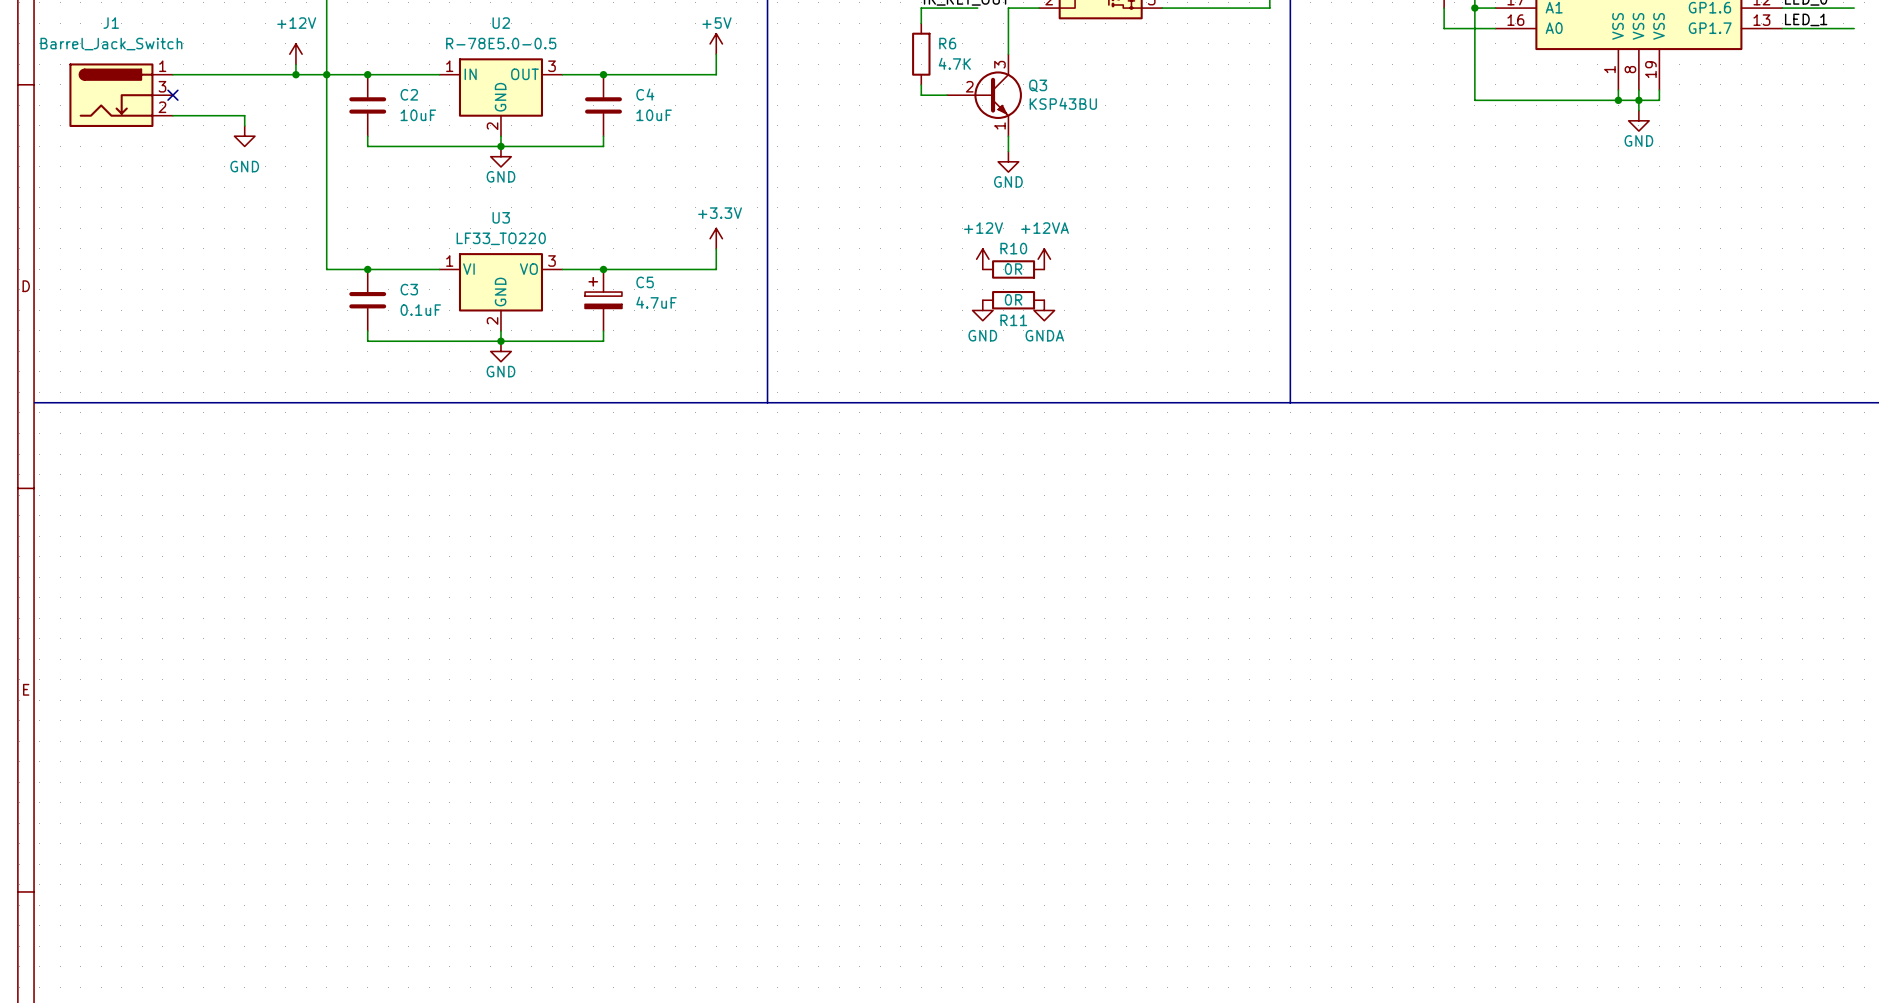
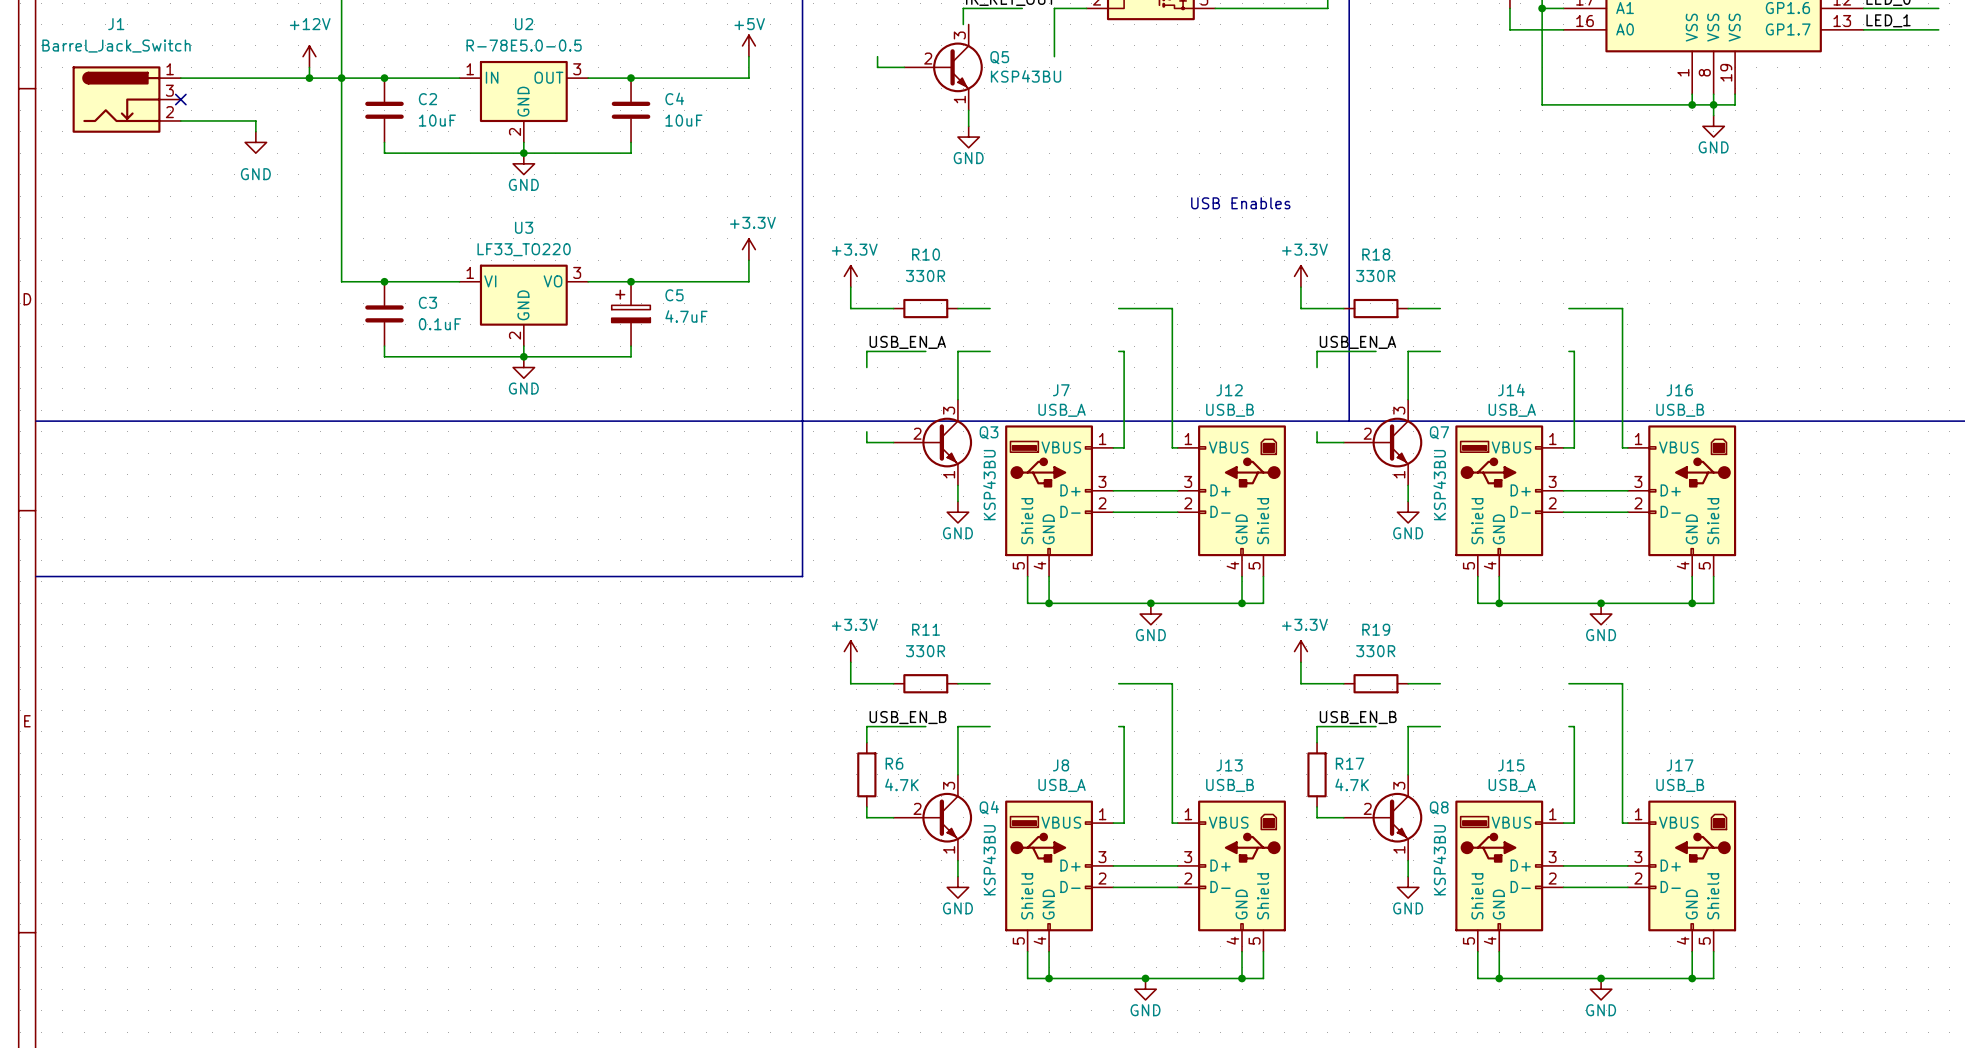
R6 position: (921, 54) -> (866, 774)
Q5: none -> KSP43BU (943, 67)
wire: (921, 84) (921, 95) (946, 95) -> (877, 56) (877, 67) (904, 67)
Q3 position: (984, 95) -> (932, 442)
Q3 value rotation: 0° (1063, 103) -> 90° counterclockwise (989, 485)
wire: (1008, 136) (1008, 151) -> (968, 110) (968, 126)
power symbol position: GND (1008, 161) -> GND (968, 137)
text: none -> USB Enables (1240, 203)
R10 name position: R10 (1013, 248) -> R10 (926, 254)
power symbol: +12V (982, 259) -> none
power symbol: +12VA (1044, 259) -> none
power symbol: none -> +3.3V (850, 276)
power symbol: none -> +3.3V (1300, 276)
R10 position: (1013, 269) -> (925, 308)
R10 value: 0R (1013, 269) -> 330R (925, 276)
wire: none -> (850, 287) (850, 308) (893, 308)
wire: none -> (1300, 287) (1300, 308) (1343, 308)
wire: none -> (957, 308) (990, 308)
wire: none -> (1118, 308) (1172, 308) (1172, 447) (1177, 447)
R18: none -> 330R (1375, 308)
wire: none -> (1408, 308) (1440, 308)
wire: none -> (1568, 308) (1622, 308) (1622, 447) (1627, 447)
R11 value: 0R (1013, 299) -> 330R (925, 651)
R11 position: (1013, 300) -> (925, 683)
power symbol: GND (982, 310) -> none
power symbol: GNDA (1044, 310) -> none
R11 name position: R11 (1013, 320) -> R11 (926, 629)
label: none -> USB_EN_A (907, 342)
label: none -> USB_EN_A (1357, 342)
wire: none -> (925, 351) (866, 351) (866, 367)
wire: none -> (990, 351) (957, 351) (957, 399)
wire: none -> (1118, 351) (1124, 351) (1124, 447) (1113, 447)
wire: none -> (1375, 351) (1317, 351) (1317, 367)
wire: none -> (1440, 351) (1408, 351) (1408, 399)
wire: none -> (1568, 351) (1574, 351) (1574, 447) (1563, 447)
line: none -> (802, 421) (802, 576) (36, 576)
wire: none -> (866, 431) (866, 442) (893, 442)
wire: none -> (1317, 431) (1317, 442) (1343, 442)
Q7: none -> KSP43BU (1383, 442)
wire: none -> (957, 485) (957, 501)
wire: none -> (1408, 485) (1408, 501)
wire: none -> (1113, 490) (1177, 490)
wire: none -> (1563, 490) (1627, 490)
J7: none -> USB_A (1059, 500)
J12: none -> USB_B (1231, 500)
J14: none -> USB_A (1509, 500)
J16: none -> USB_B (1682, 500)
power symbol: none -> GND (957, 512)
wire: none -> (1113, 512) (1177, 512)
power symbol: none -> GND (1408, 512)
wire: none -> (1563, 512) (1627, 512)
wire: none -> (1027, 576) (1027, 603) (1263, 603) (1263, 576)
wire: none -> (1049, 576) (1049, 603)
wire: none -> (1242, 576) (1242, 603)
wire: none -> (1477, 576) (1477, 603) (1713, 603) (1713, 576)
wire: none -> (1499, 576) (1499, 603)
wire: none -> (1692, 576) (1692, 603)
junction: none -> (1049, 603)
junction: none -> (1150, 603)
junction: none -> (1242, 603)
junction: none -> (1499, 603)
junction: none -> (1601, 603)
junction: none -> (1692, 603)
power symbol: none -> GND (1150, 614)
power symbol: none -> GND (1601, 614)
power symbol: none -> +3.3V (850, 651)
power symbol: none -> +3.3V (1300, 651)
wire: none -> (850, 662) (850, 683) (893, 683)
wire: none -> (1300, 662) (1300, 683) (1343, 683)
wire: none -> (957, 683) (990, 683)
wire: none -> (1118, 683) (1172, 683) (1172, 823) (1177, 823)
R19: none -> 330R (1375, 683)
wire: none -> (1408, 683) (1440, 683)
wire: none -> (1568, 683) (1622, 683) (1622, 823) (1627, 823)
label: none -> USB_EN_B (908, 717)
label: none -> USB_EN_B (1358, 717)
wire: none -> (925, 726) (866, 726) (866, 742)
wire: none -> (990, 726) (957, 726) (957, 774)
wire: none -> (1118, 726) (1124, 726) (1124, 823) (1113, 823)
wire: none -> (1375, 726) (1317, 726) (1317, 742)
wire: none -> (1440, 726) (1408, 726) (1408, 774)
wire: none -> (1568, 726) (1574, 726) (1574, 823) (1563, 823)
R17: none -> 4.7K (1317, 774)
wire: none -> (866, 806) (866, 817) (893, 817)
wire: none -> (1317, 806) (1317, 817) (1343, 817)
Q4: none -> KSP43BU (932, 817)
Q8: none -> KSP43BU (1383, 817)
wire: none -> (957, 860) (957, 876)
wire: none -> (1408, 860) (1408, 876)
wire: none -> (1113, 865) (1177, 865)
wire: none -> (1563, 865) (1627, 865)
J8: none -> USB_A (1059, 876)
J13: none -> USB_B (1231, 876)
J15: none -> USB_A (1509, 876)
J17: none -> USB_B (1682, 876)
power symbol: none -> GND (957, 887)
wire: none -> (1113, 887) (1177, 887)
power symbol: none -> GND (1408, 887)
wire: none -> (1563, 887) (1627, 887)
wire: none -> (1027, 951) (1027, 978) (1263, 978) (1263, 951)
wire: none -> (1049, 951) (1049, 978)
wire: none -> (1242, 951) (1242, 978)
wire: none -> (1477, 951) (1477, 978) (1713, 978) (1713, 951)
wire: none -> (1499, 951) (1499, 978)
wire: none -> (1692, 951) (1692, 978)
junction: none -> (1049, 978)
junction: none -> (1145, 978)
junction: none -> (1242, 978)
junction: none -> (1499, 978)
junction: none -> (1601, 978)
junction: none -> (1692, 978)
power symbol: none -> GND (1145, 989)
power symbol: none -> GND (1601, 989)

